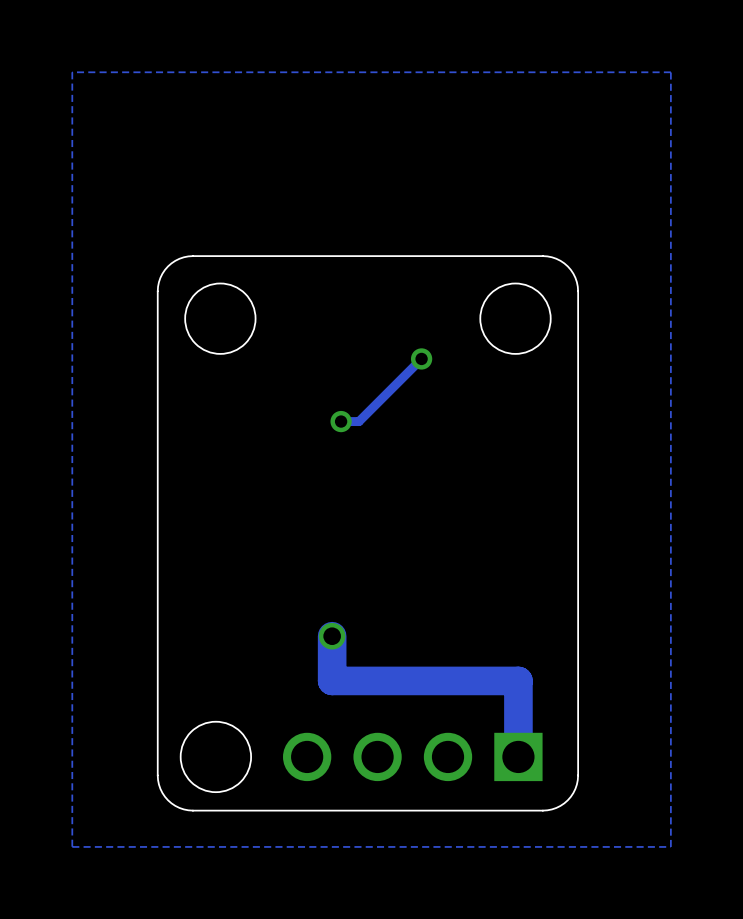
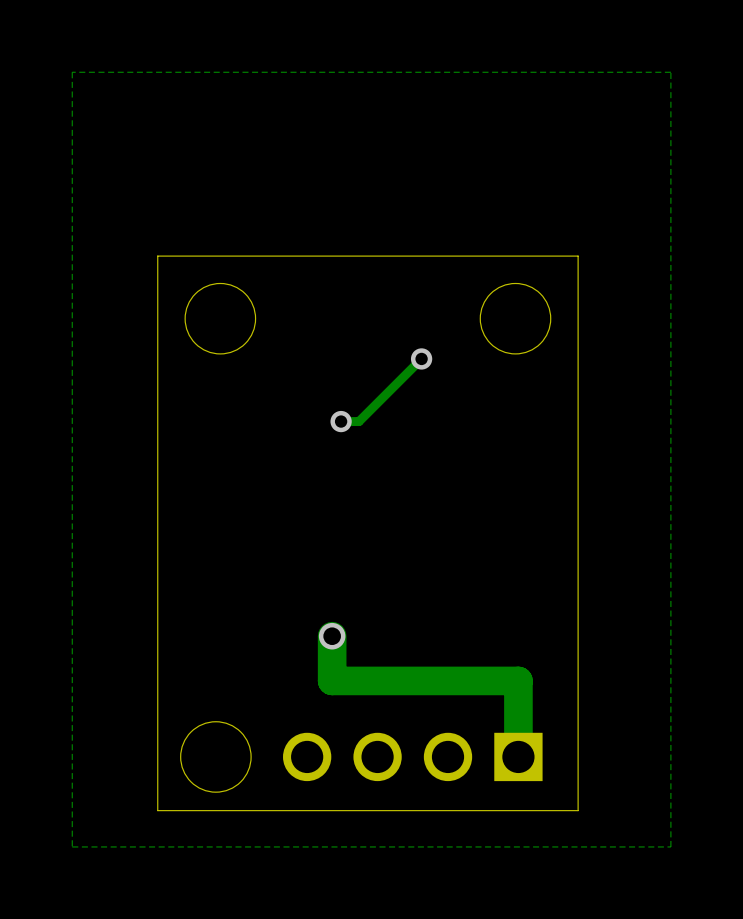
board edge: (192, 256) (179, 258) (168, 266) (160, 277) (157, 291) -> (192, 256) (157, 256) (157, 291)
board edge: (542, 256) (556, 258) (567, 266) (575, 277) (578, 291) -> (542, 256) (578, 256) (578, 291)
board edge: (157, 775) (160, 788) (168, 800) (179, 807) (192, 810) -> (157, 775) (157, 810) (192, 810)
board edge: (578, 775) (575, 788) (567, 800) (556, 807) (542, 810) -> (578, 775) (578, 810) (542, 810)

